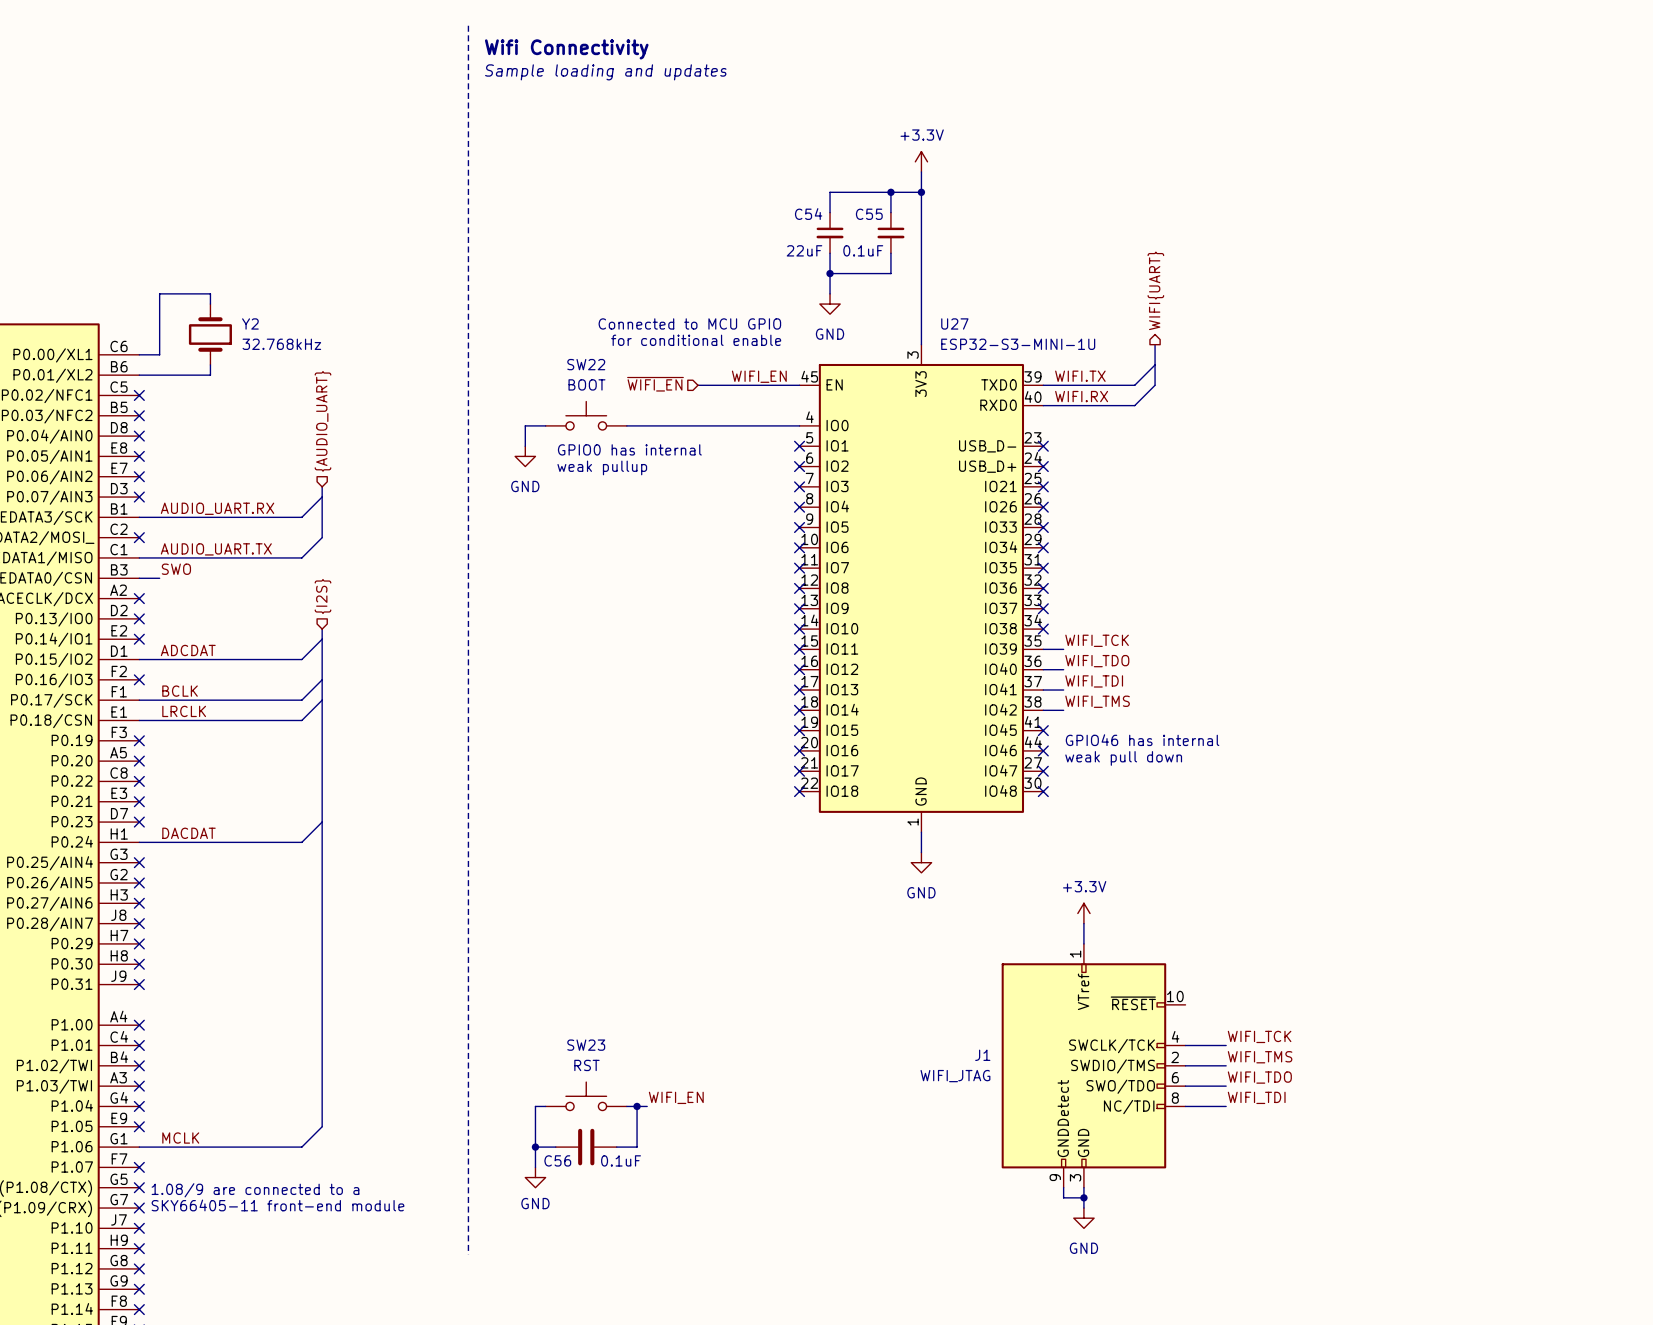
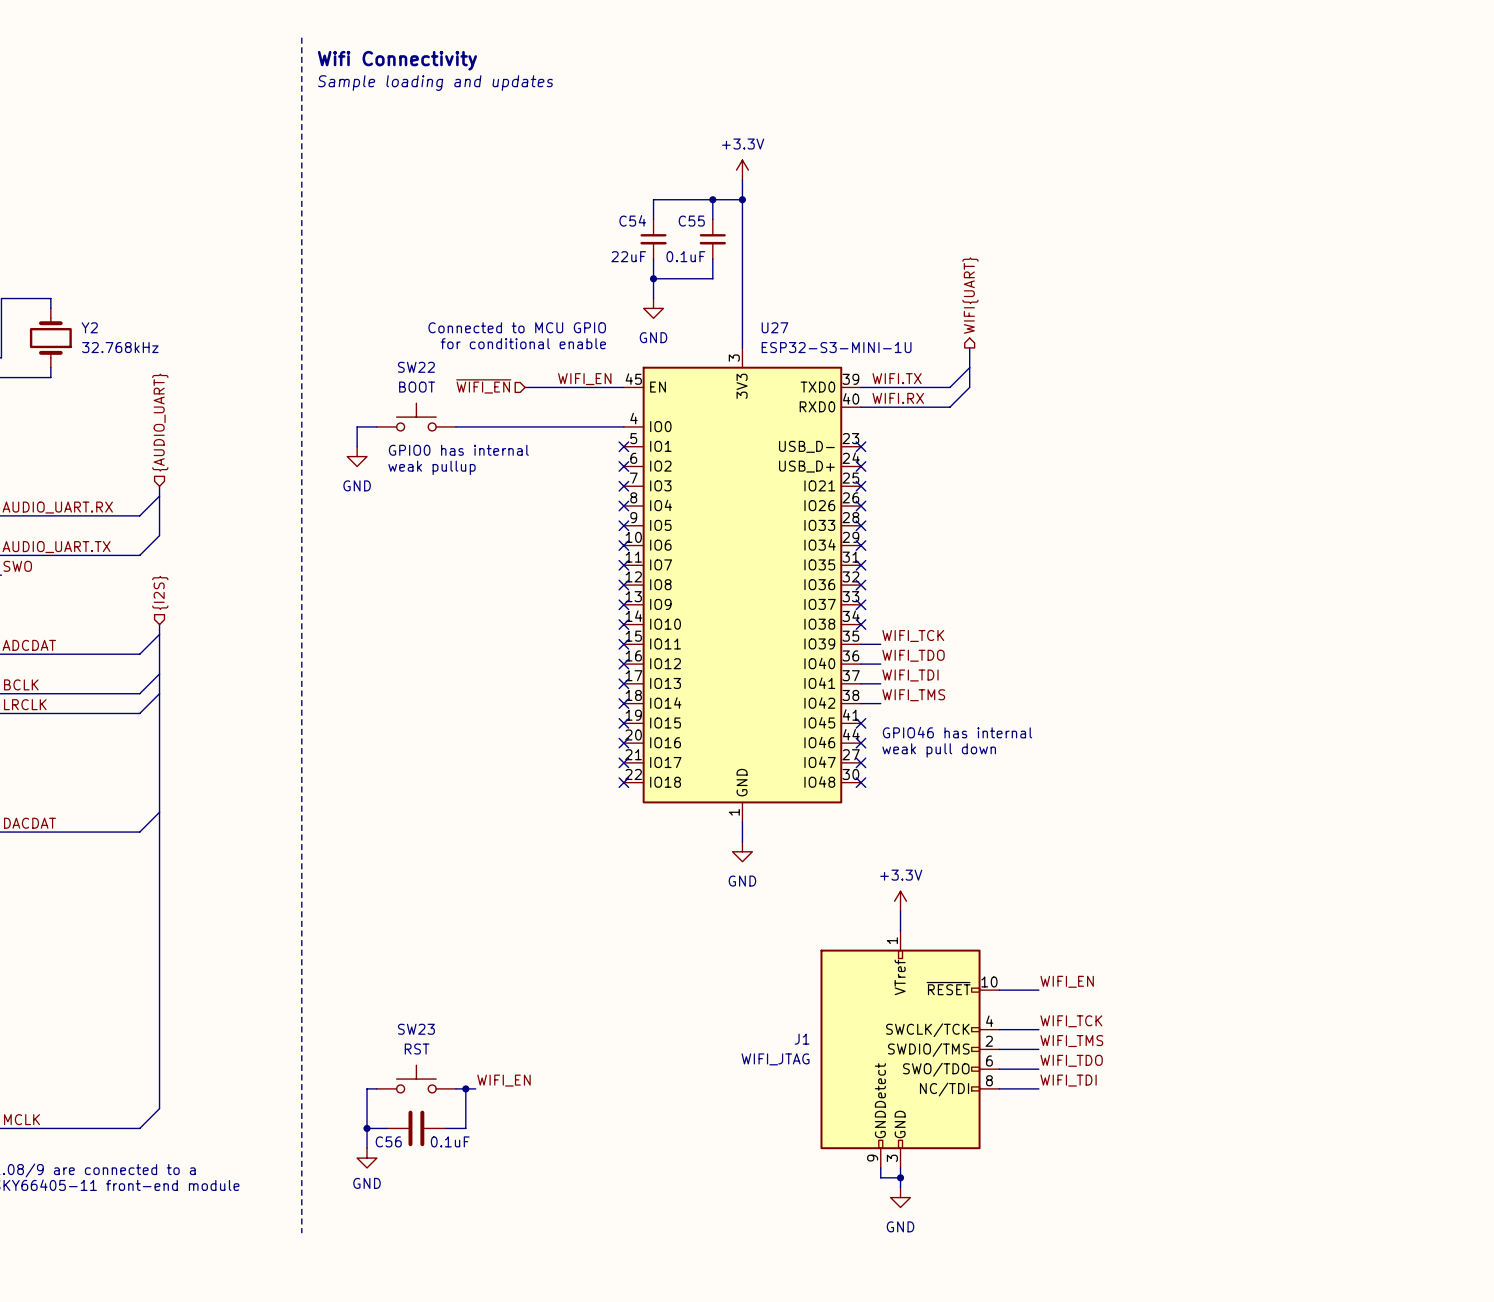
label: none -> WIFI_EN (1067, 981)
wire: none -> (999, 990) (1038, 990)

